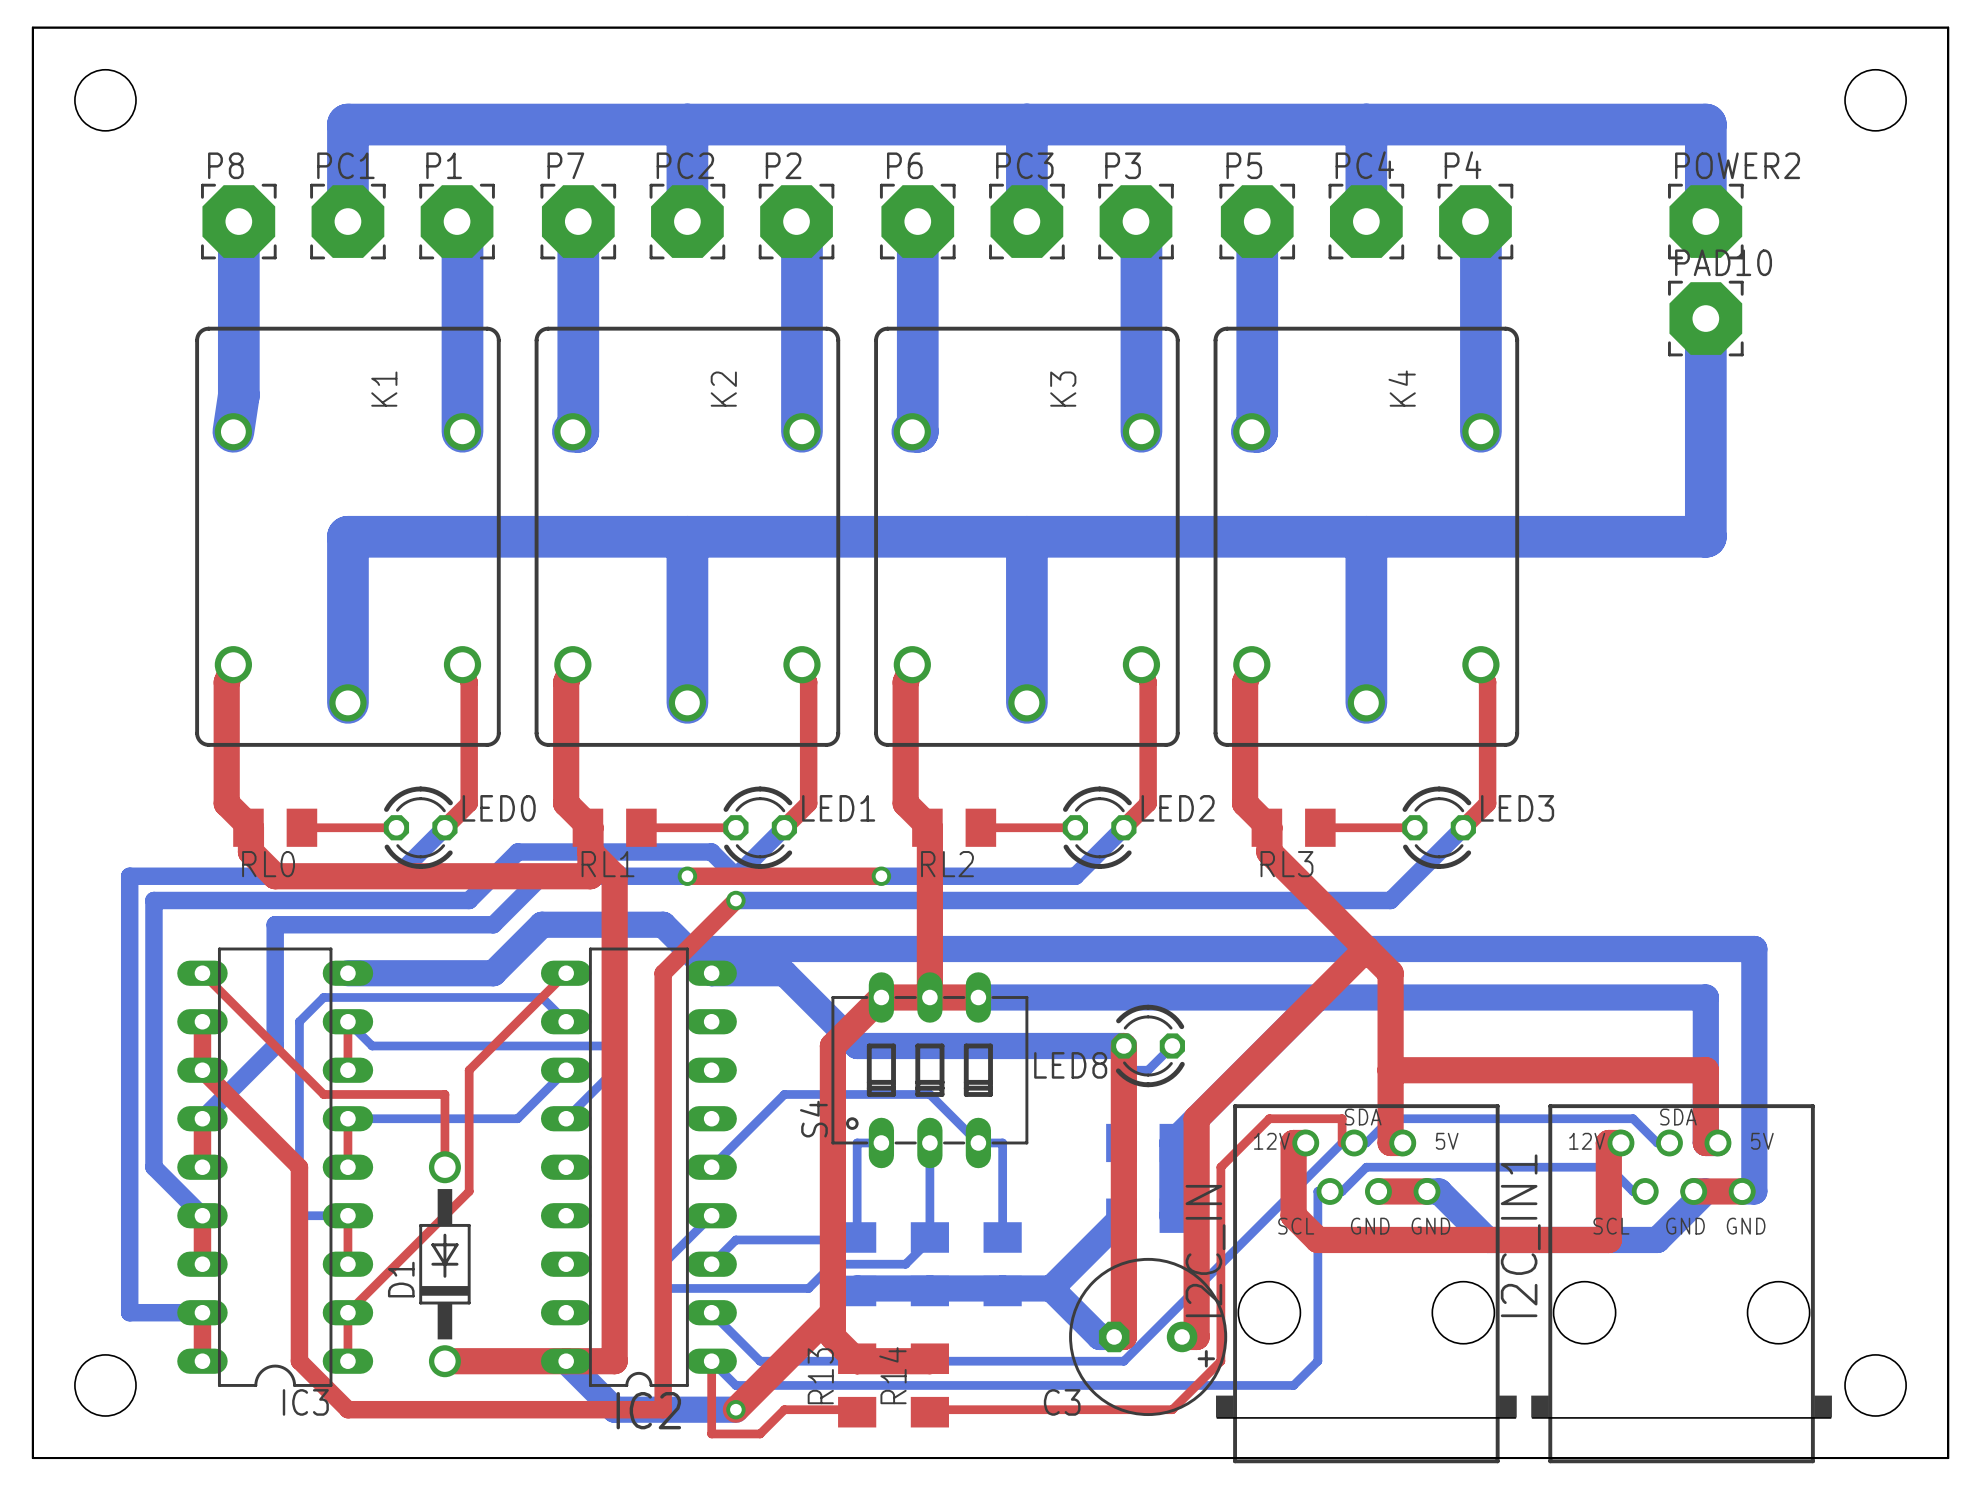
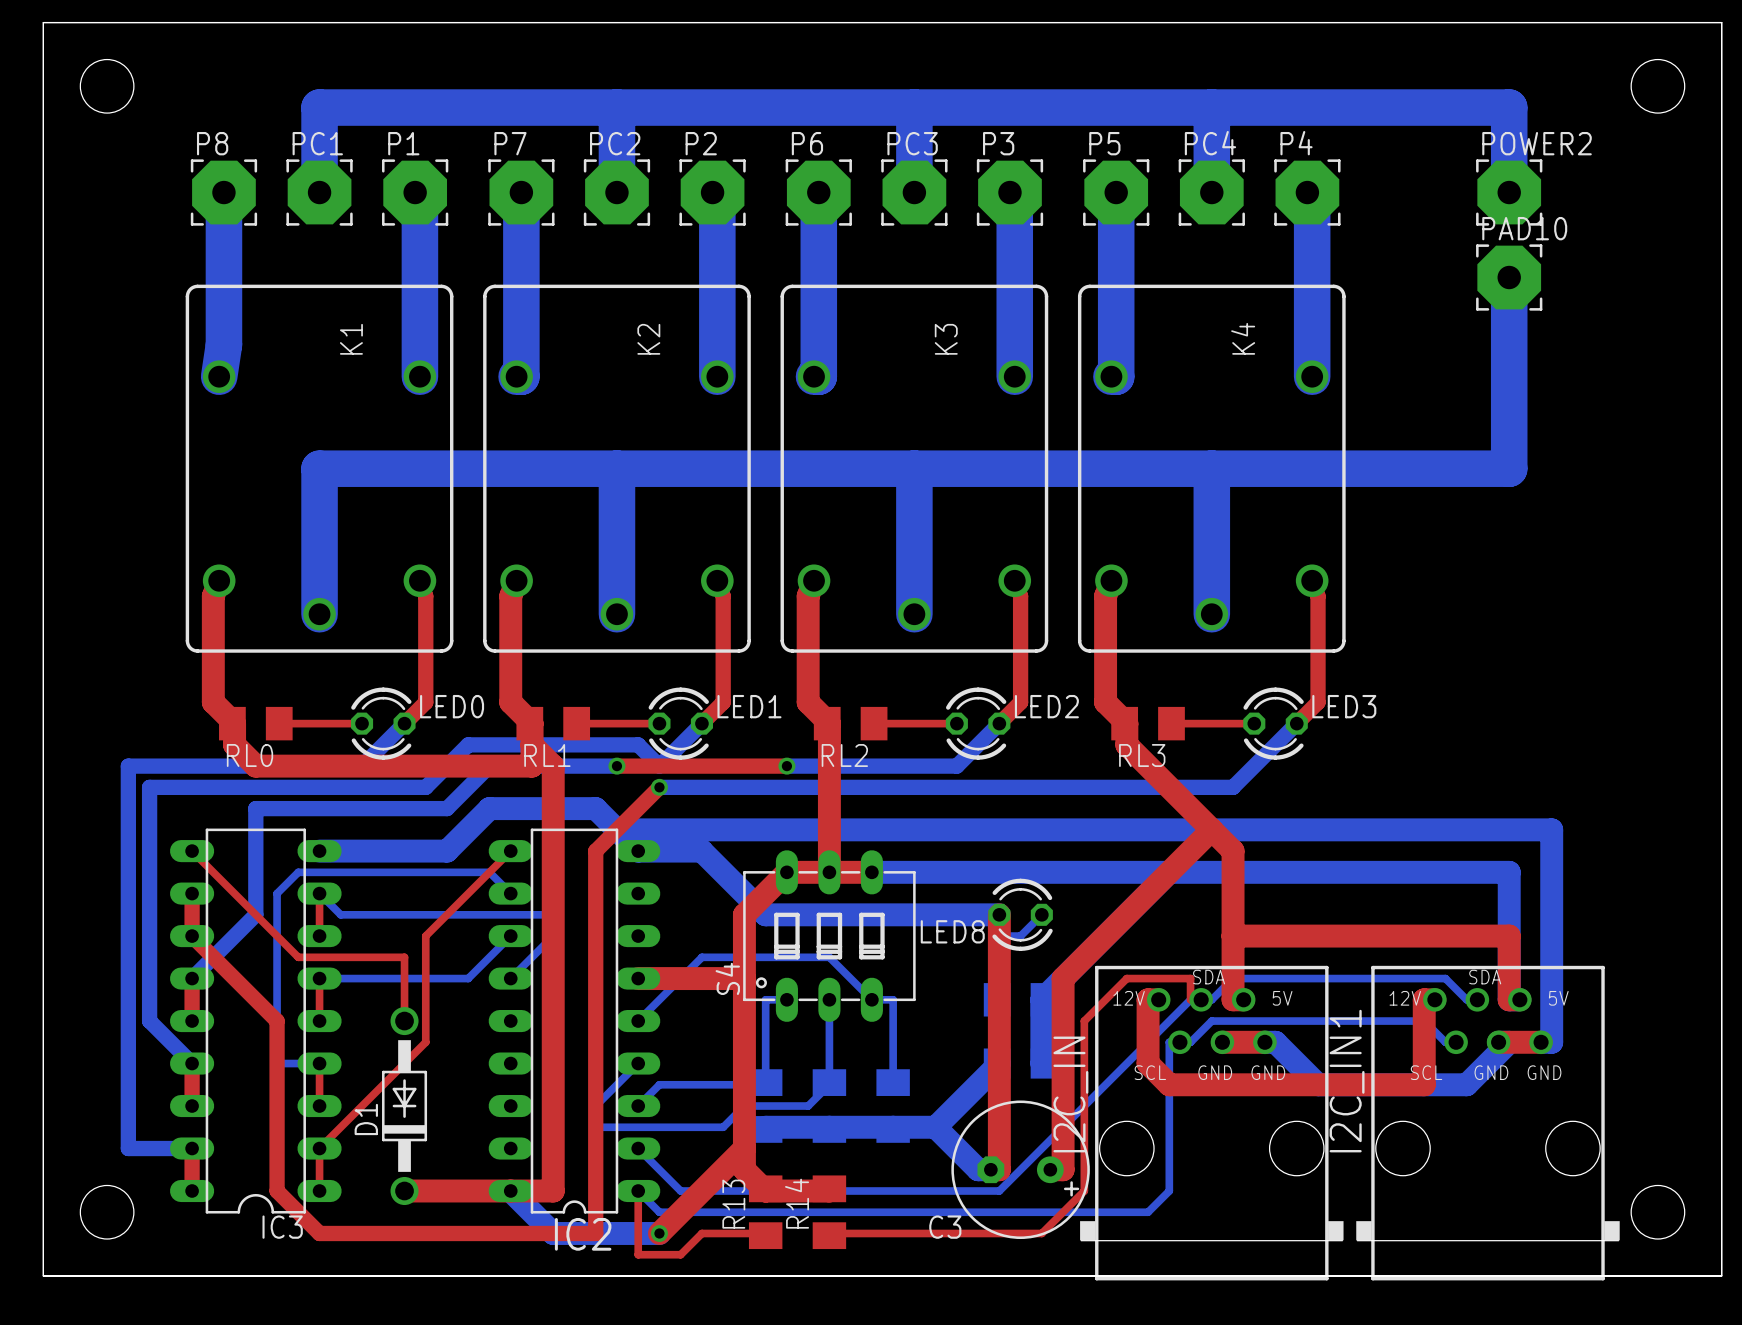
top track: none -> (638, 978) (744, 978)

